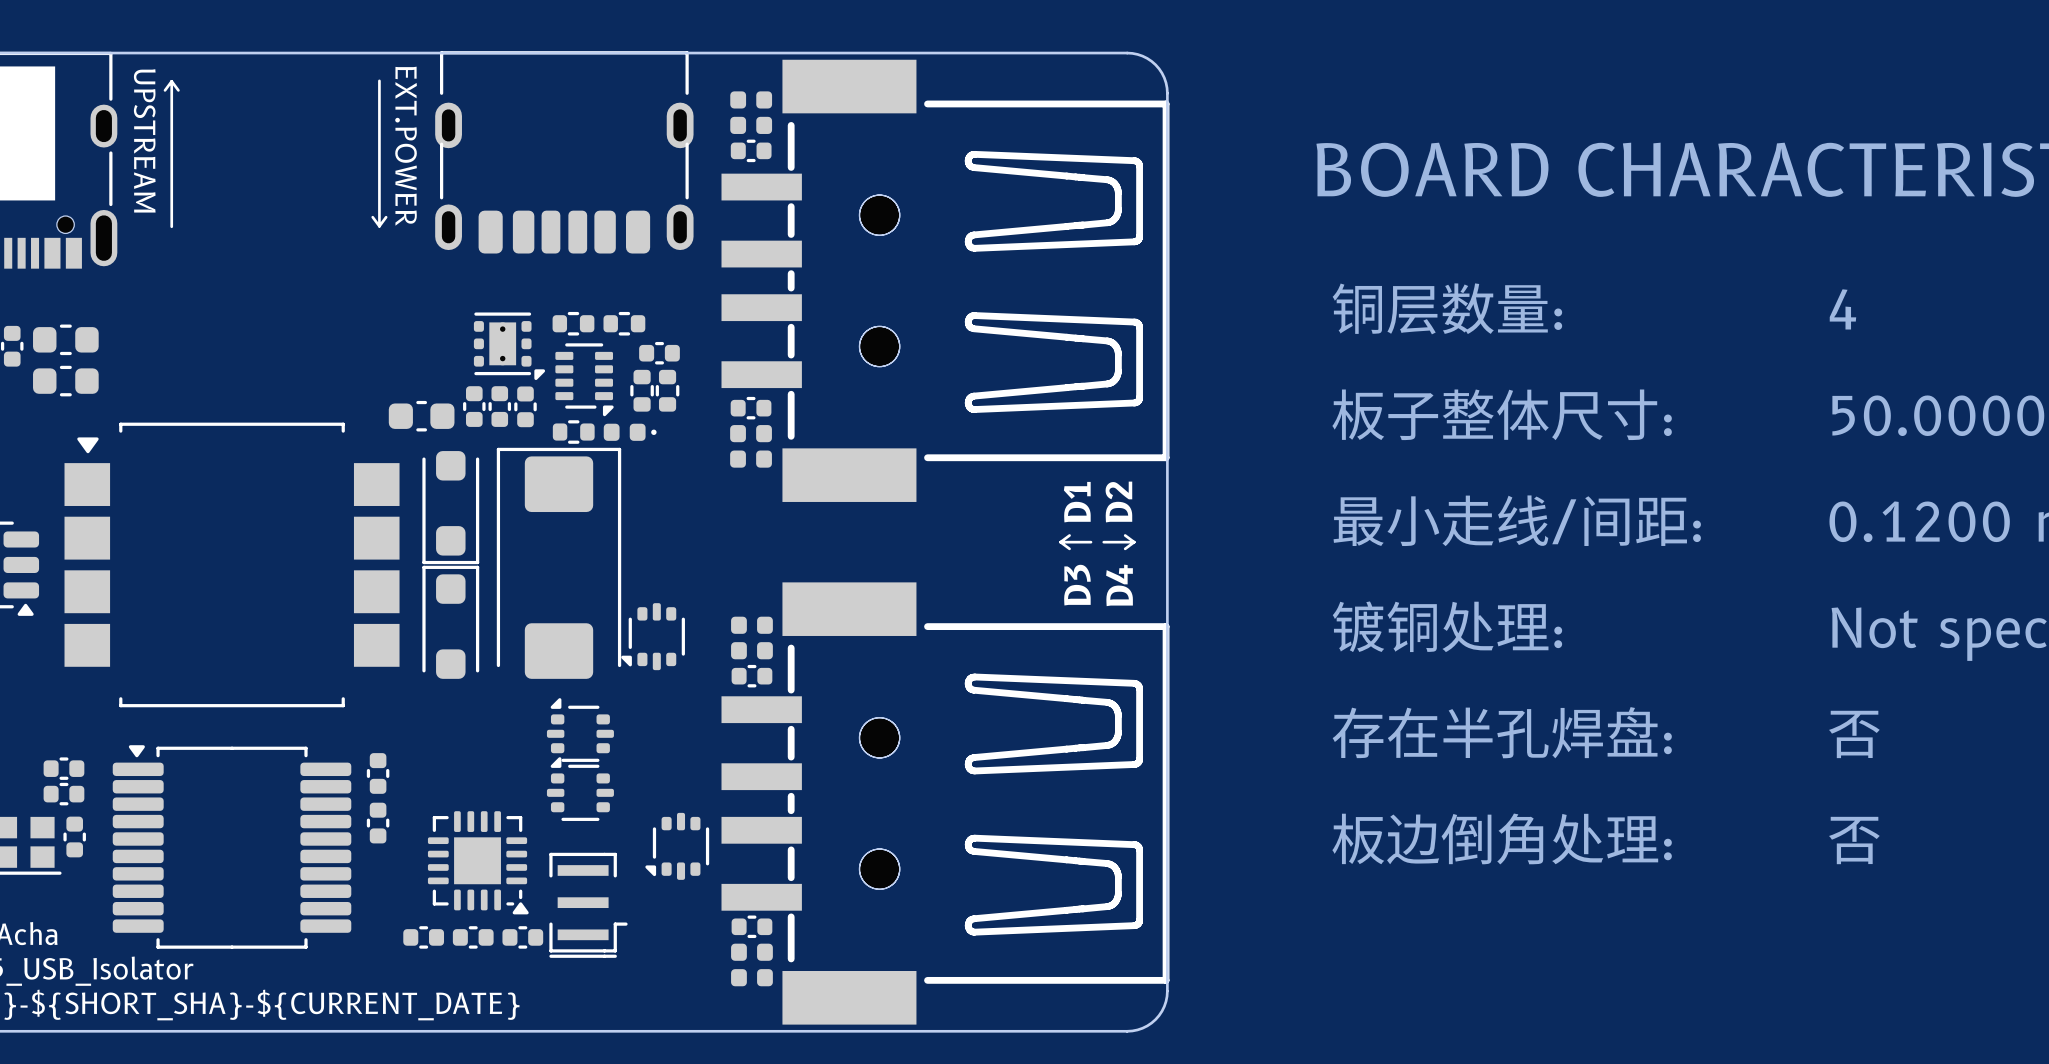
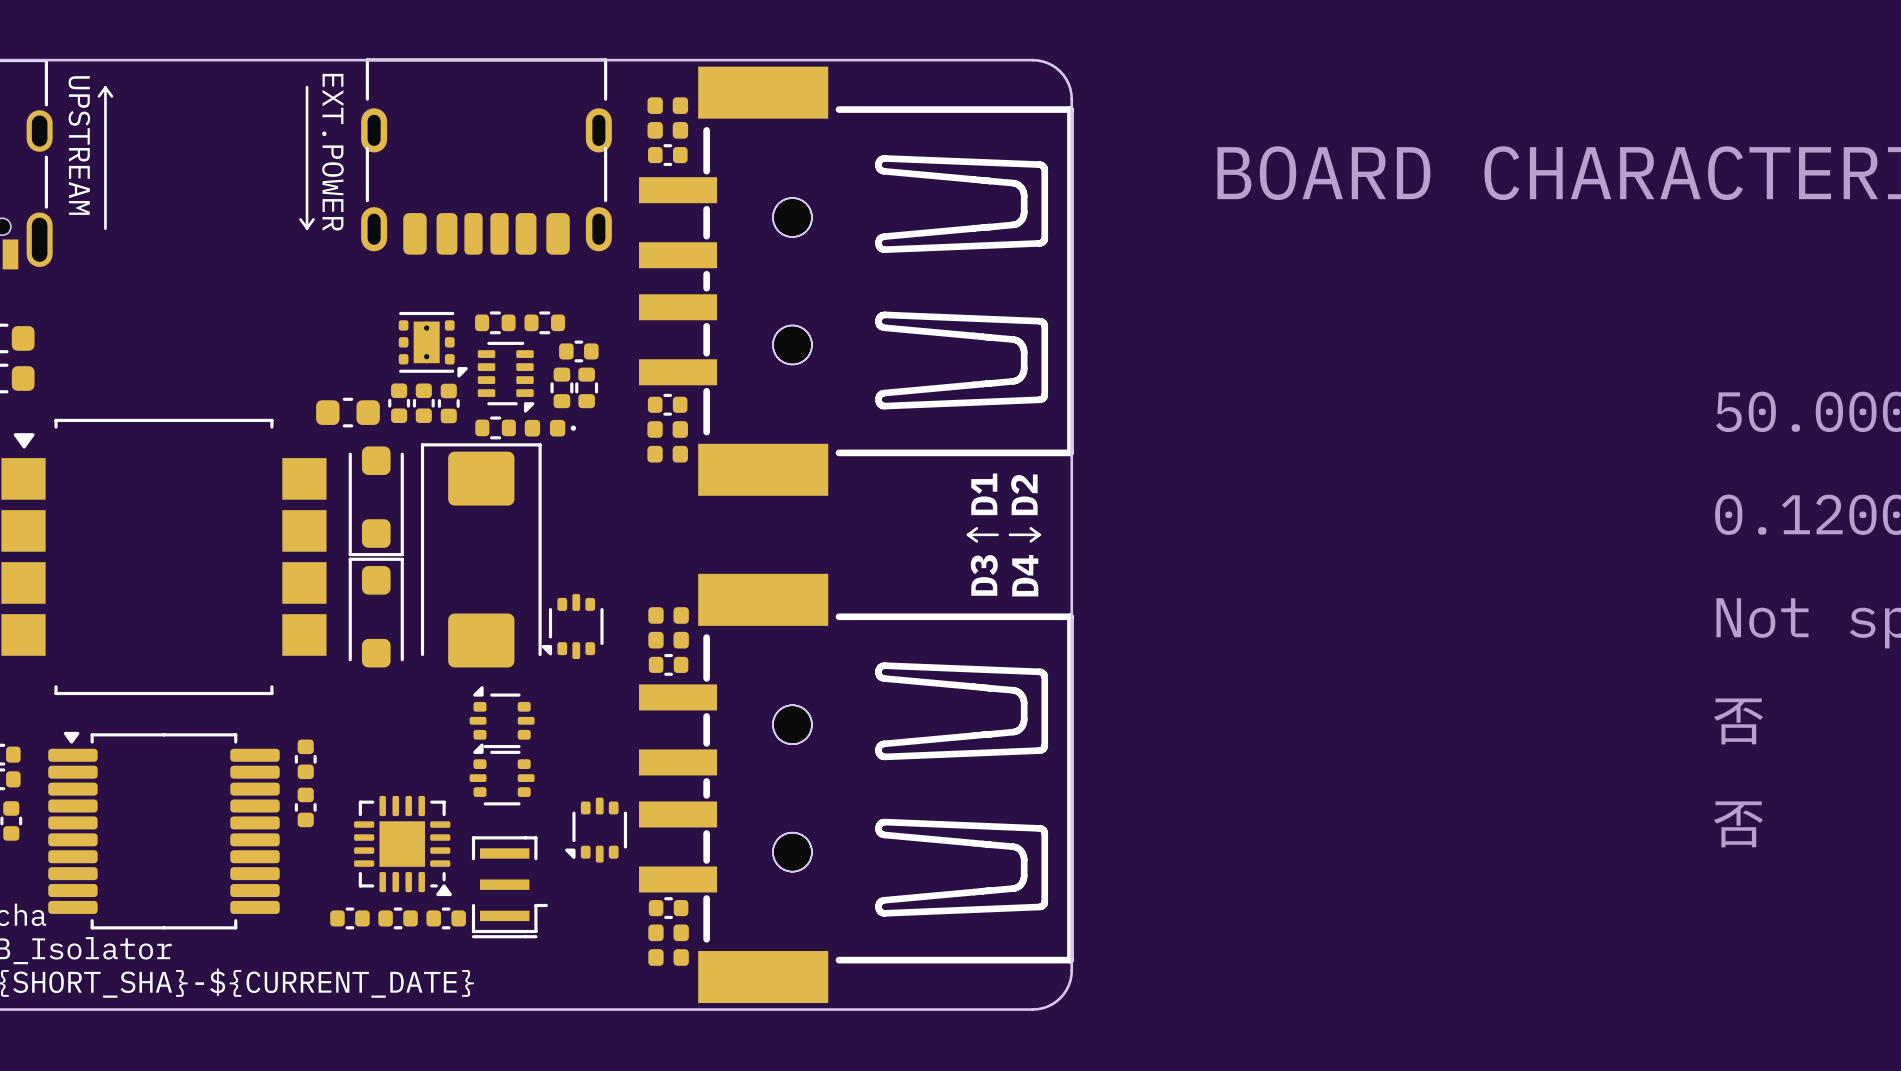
text: 铜层数量: (1447, 308) -> none
text: 4 (1842, 309) -> none
text: 板子整体尺寸: (1502, 414) -> none
text: 最小走线/间距: (1517, 520) -> none
text: 镀铜处理: (1447, 626) -> none
text: 存在半孔焊盘: (1502, 732) -> none
text: 板边倒角处理: (1502, 838) -> none

